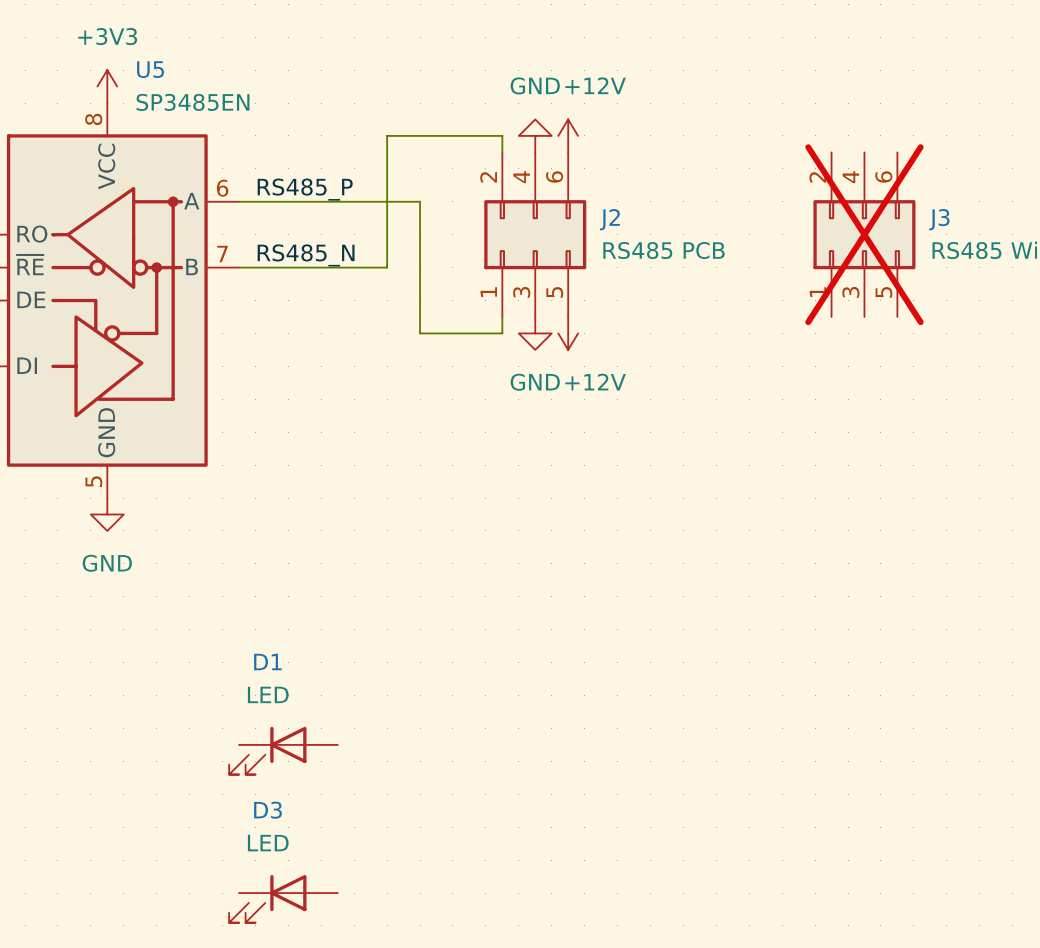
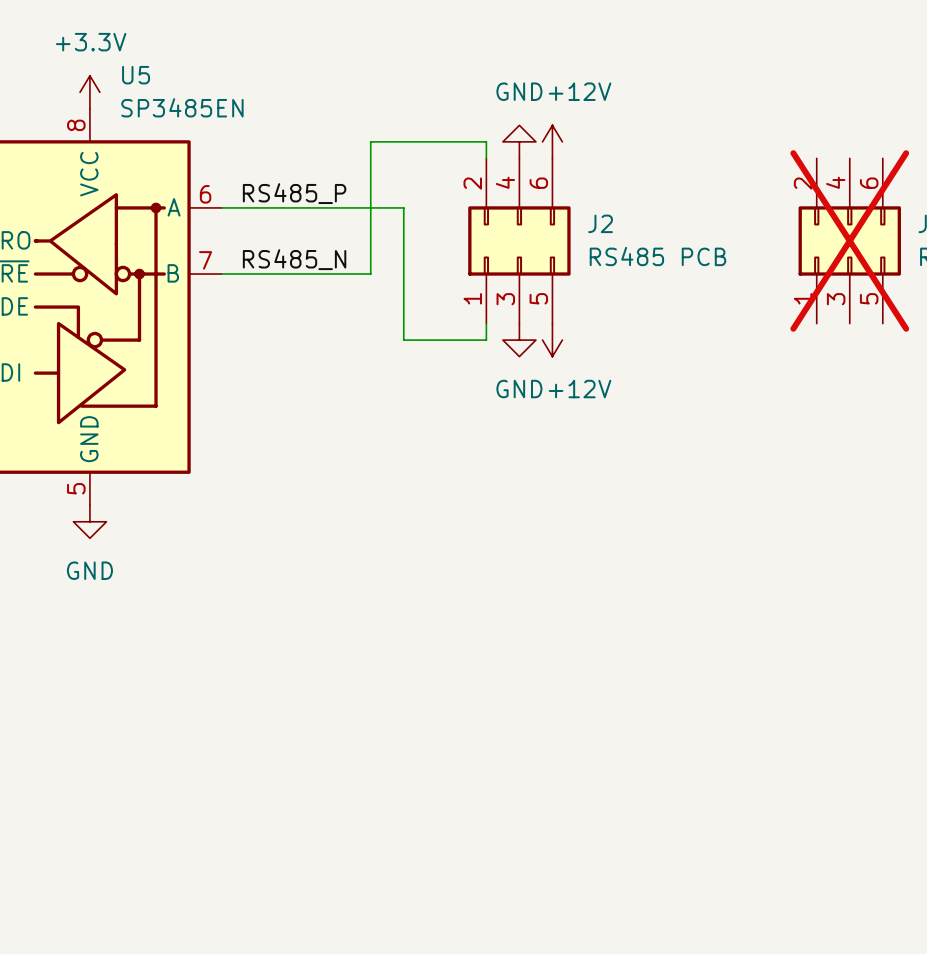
power symbol: +3V3 (107, 86) -> +3.3V (89, 92)
D1: LED (283, 750) -> none
D3: LED (283, 898) -> none

